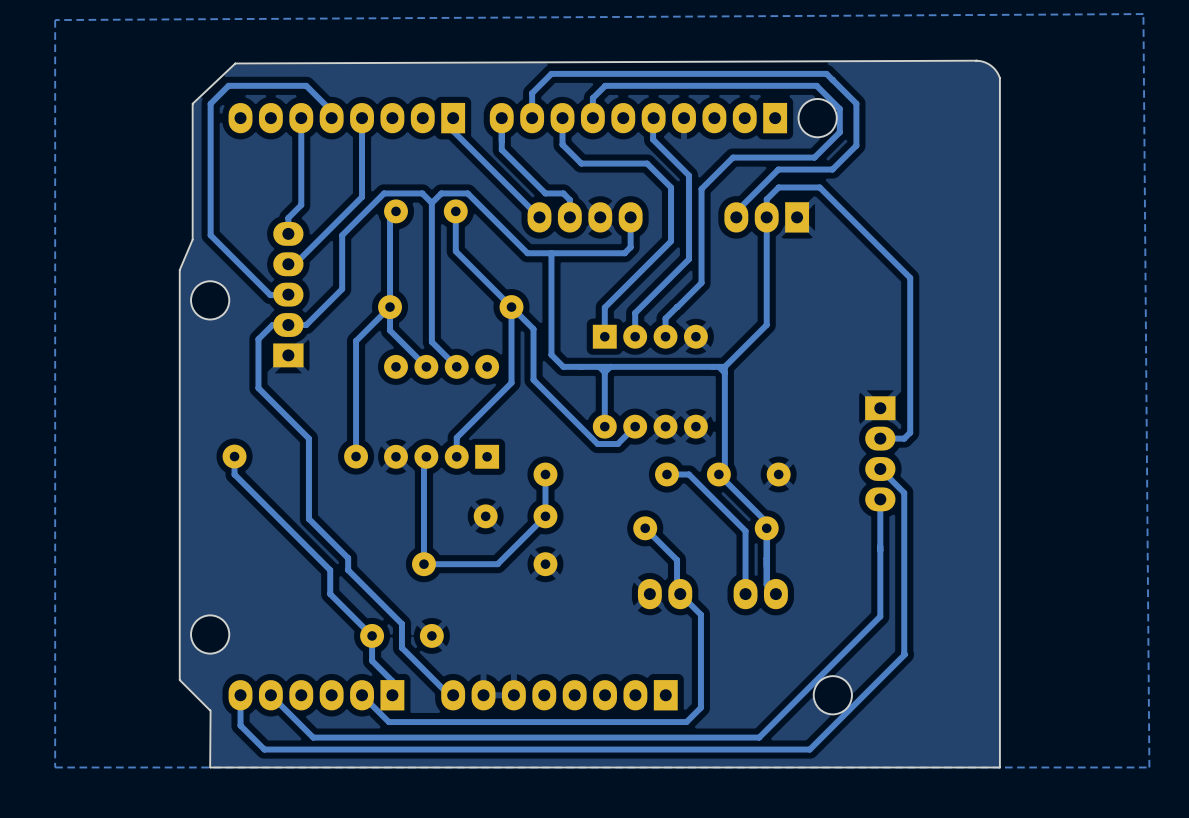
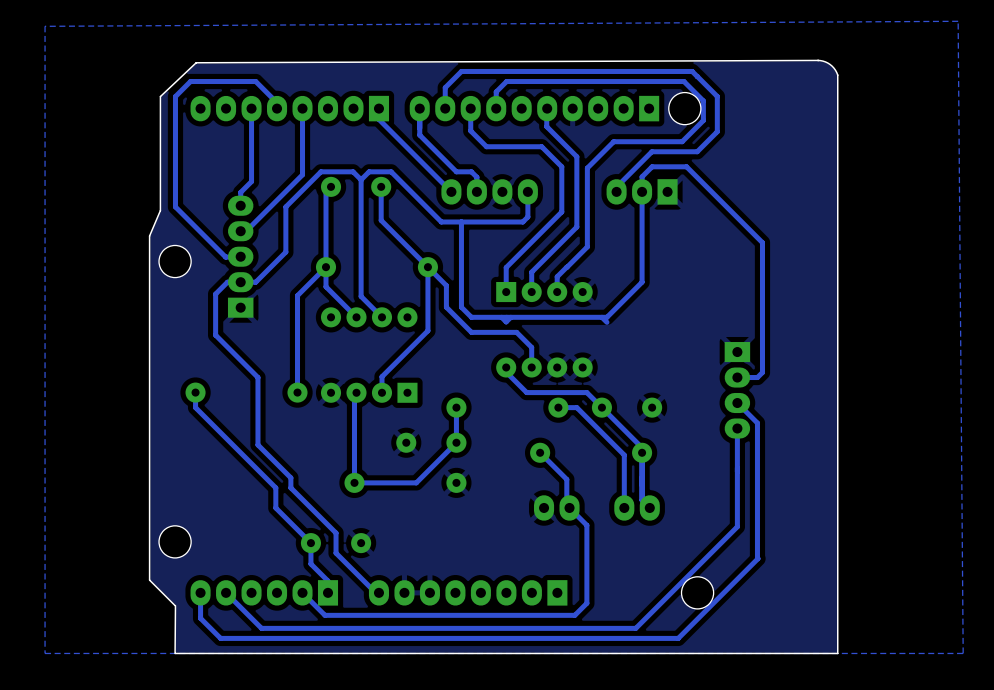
bottom track: (533, 354) (533, 379) (597, 444) (617, 444) (635, 426) -> (446, 307) (471, 332) (516, 332) (531, 347) (531, 367)
bottom track: (724, 366) (724, 468) (718, 474) -> (506, 372) (526, 392) (586, 392) (601, 407)
bottom track: (604, 372) (604, 426) -> none

